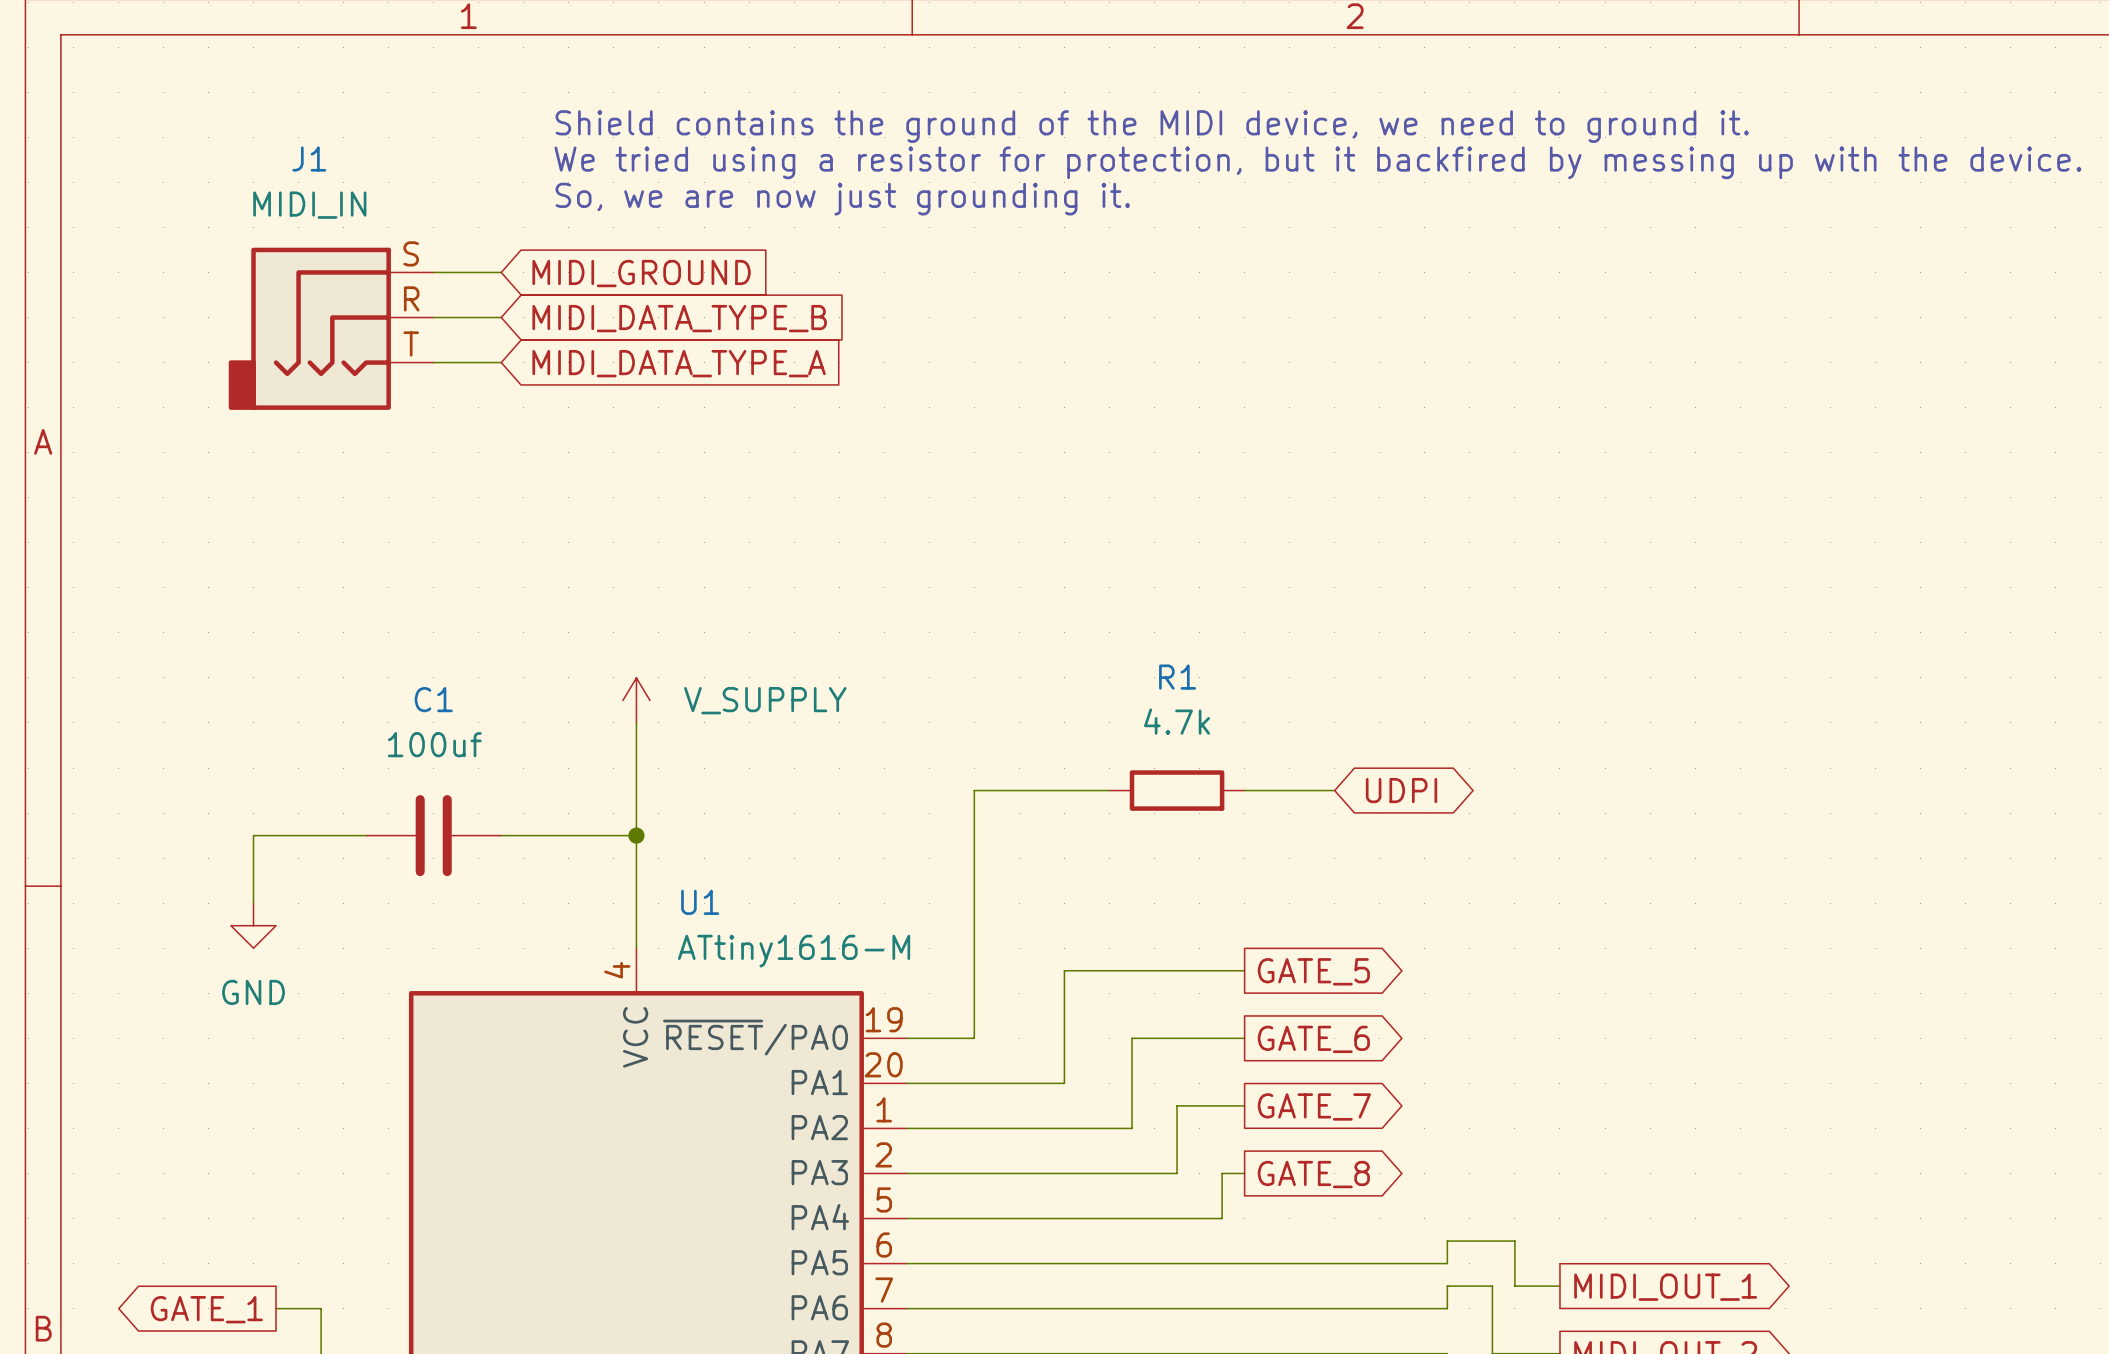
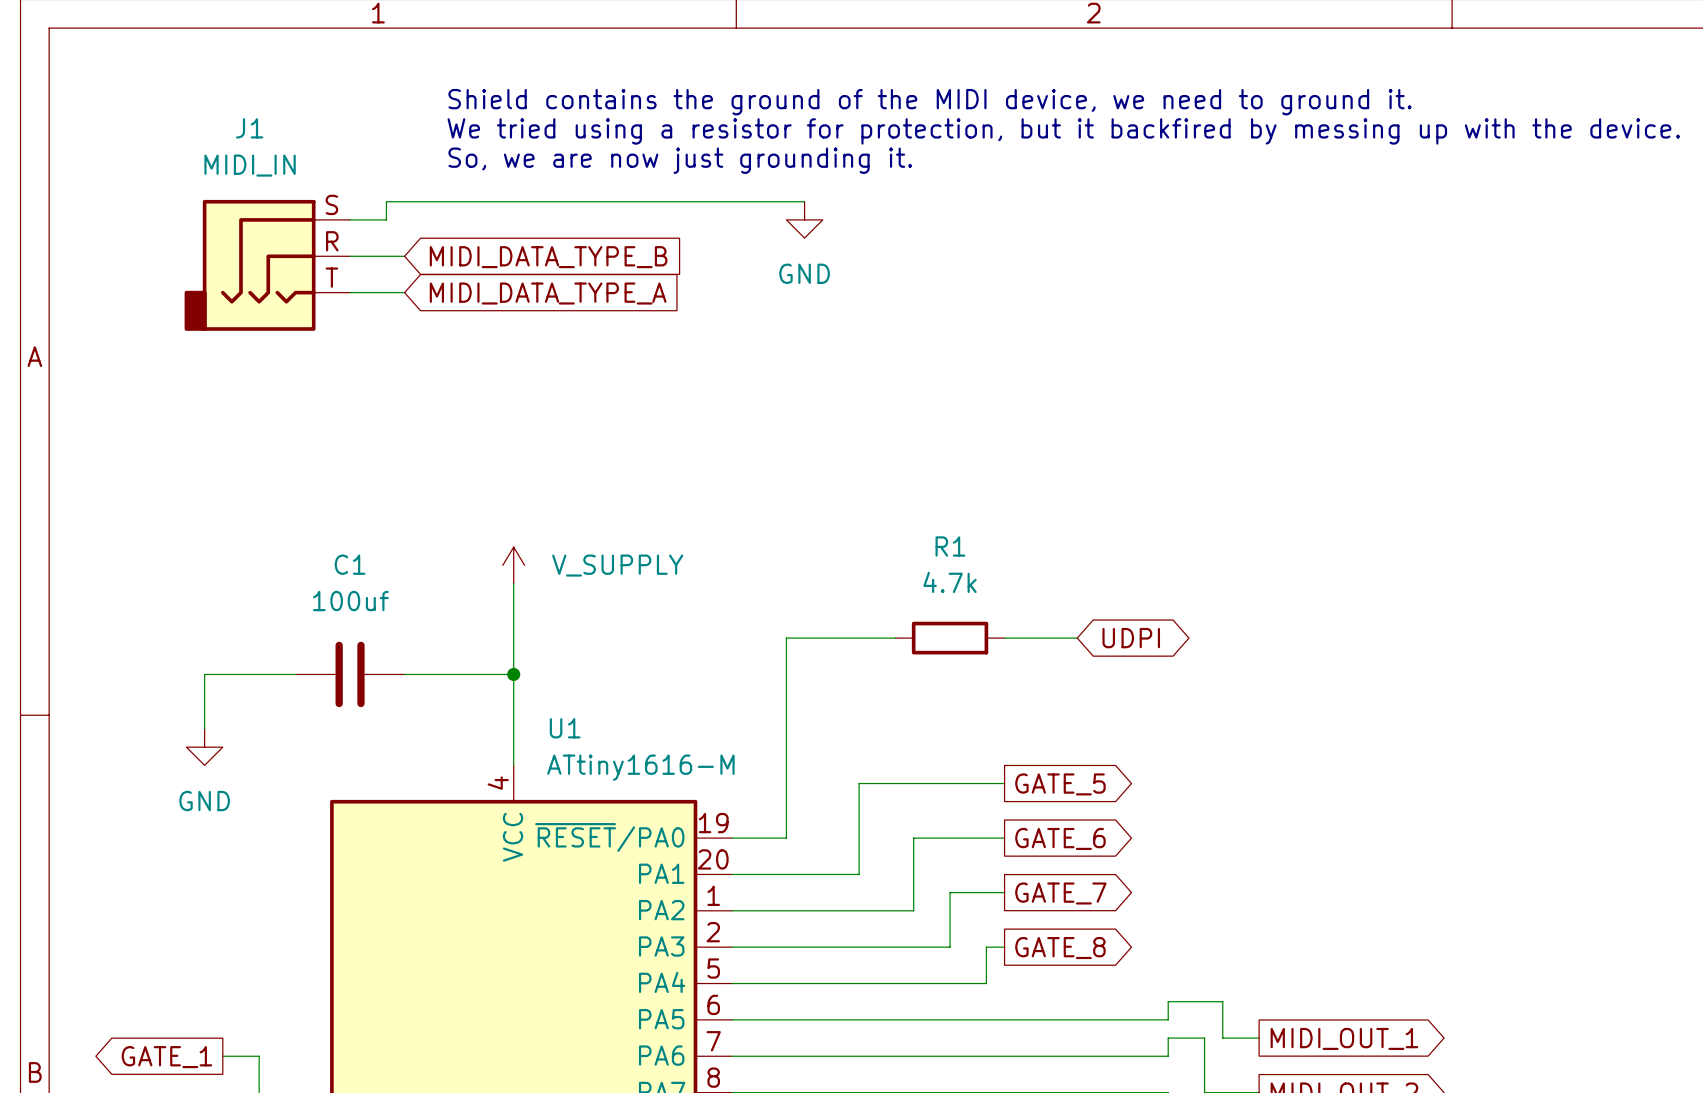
wire: (478, 272) (501, 272) -> (386, 219) (386, 201) (804, 201)
power symbol: none -> GND (804, 219)
global label: MIDI_GROUND (641, 273) -> none

